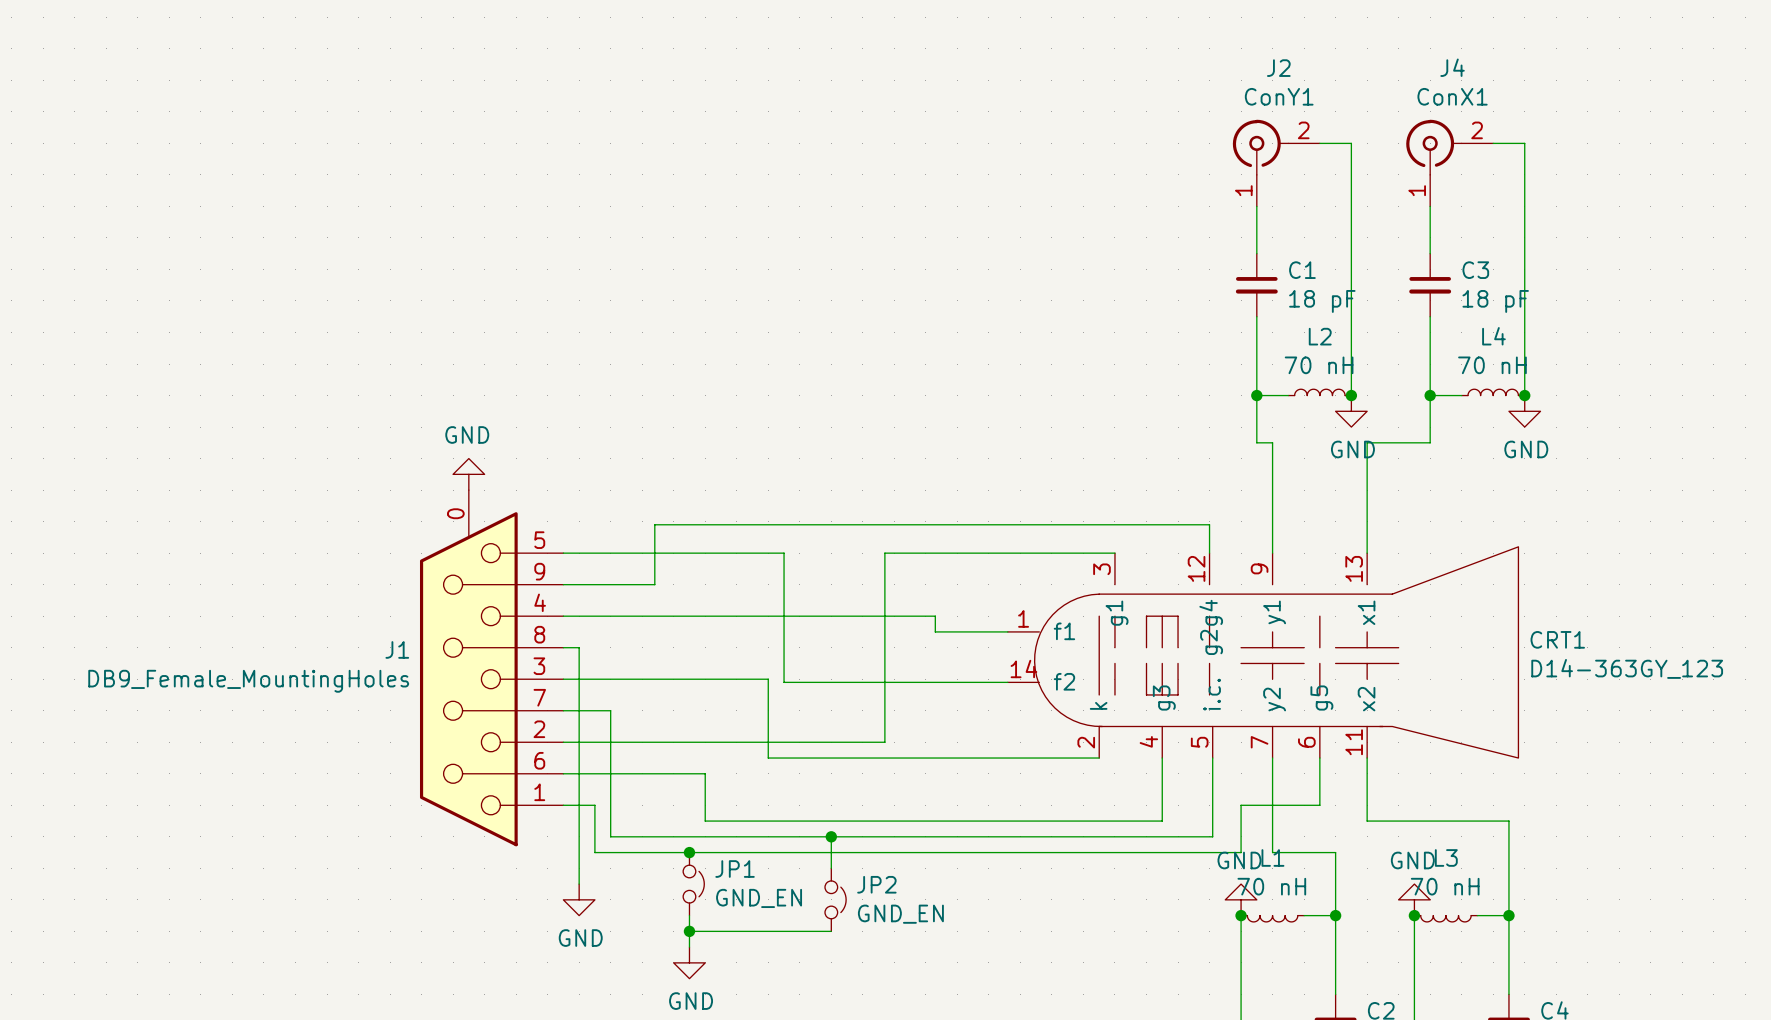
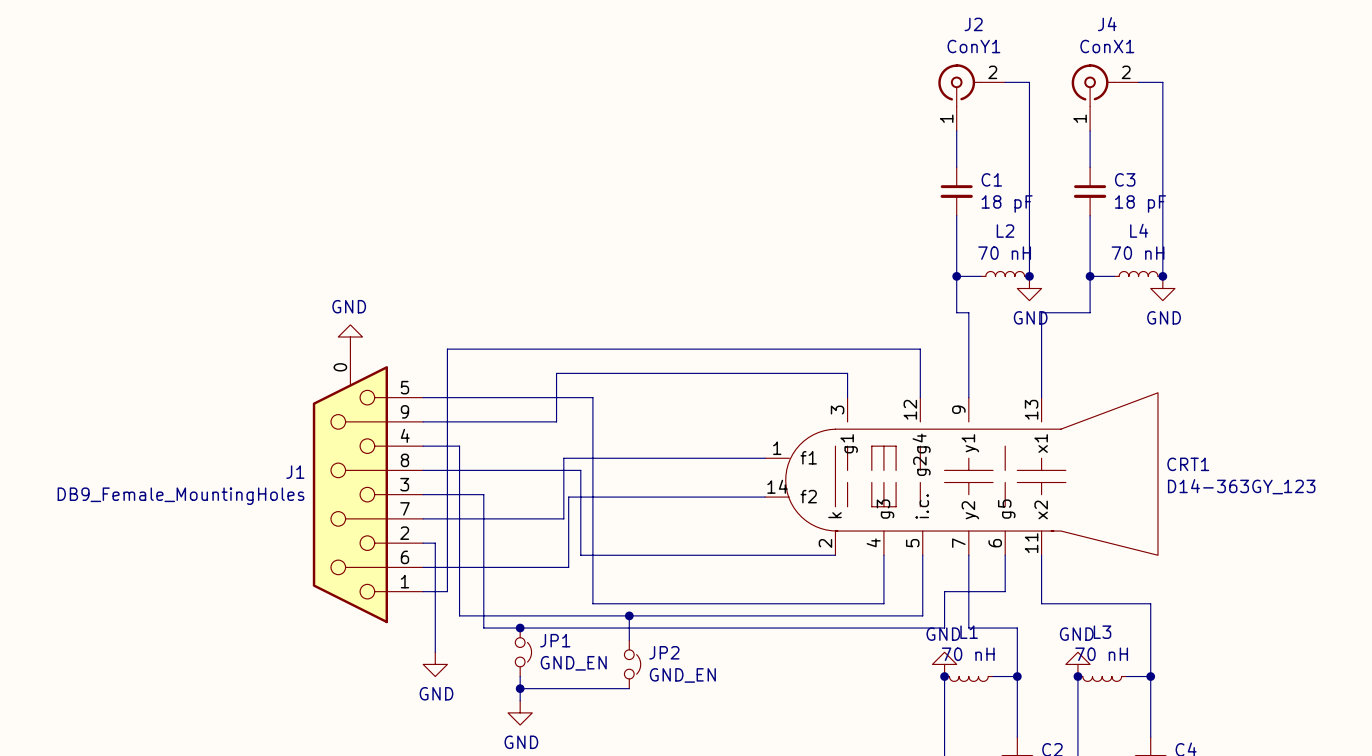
wire: (1209, 524) (654, 524) (654, 584) -> (920, 375) (920, 349) (447, 349) (447, 591)
wire: (1114, 553) (884, 553) (884, 742) (579, 742) (579, 647) -> (847, 397) (847, 373) (556, 373) (556, 421) (493, 421)
wire: (610, 616) (935, 616) (935, 631) -> (459, 446) (459, 518) (563, 518) (563, 458) (709, 458)
wire: (642, 679) (768, 679) -> (435, 470) (580, 470) (580, 494)
wire: (705, 773) (705, 821) (784, 821) -> (532, 567) (568, 567) (568, 497) (592, 497) (592, 603)
wire: (594, 805) (594, 852) (642, 852) -> (483, 494) (483, 628)

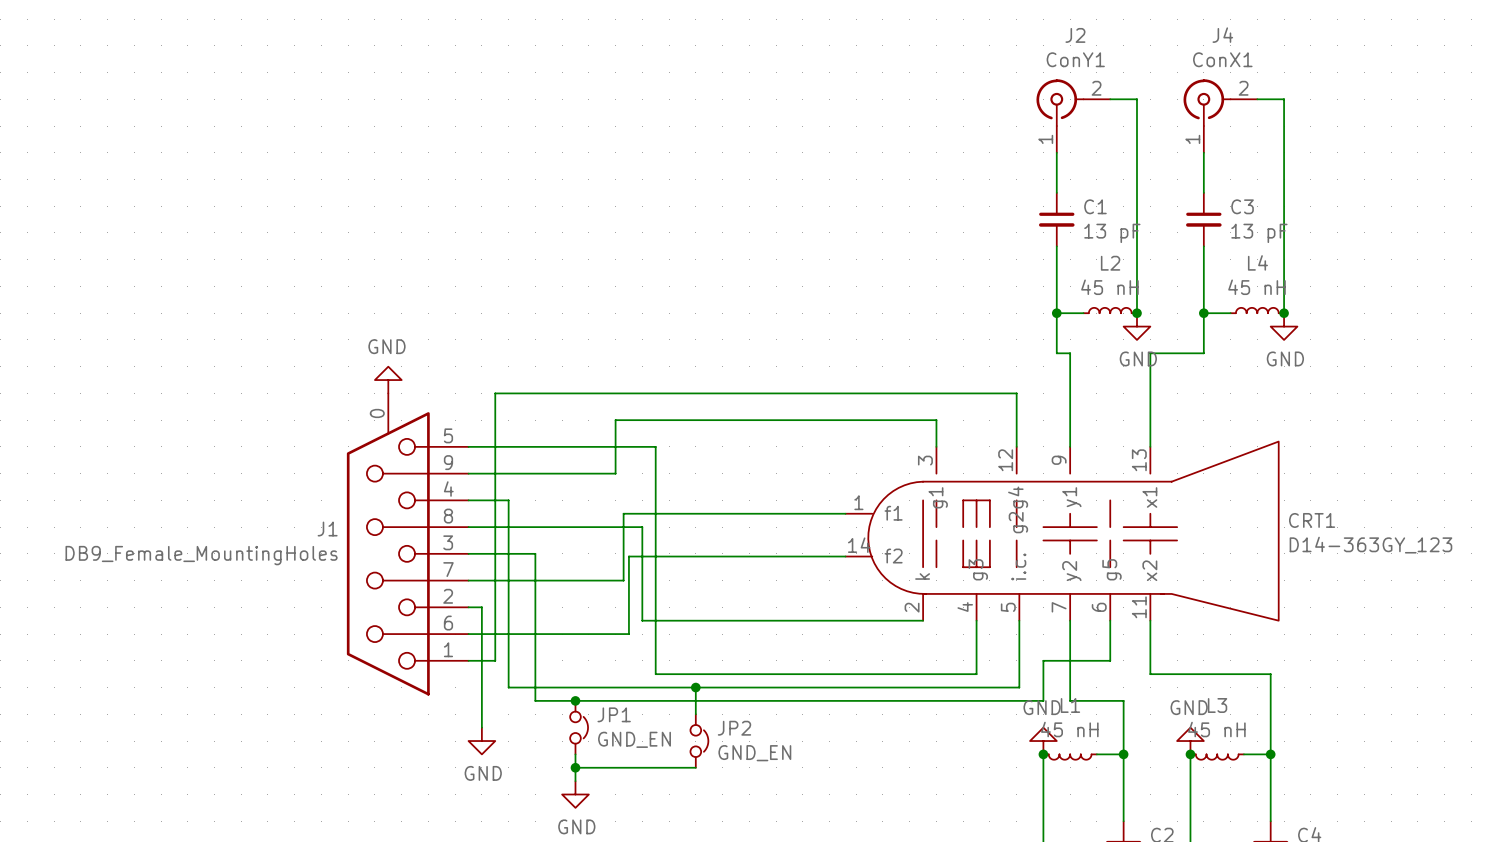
C1 value: 18 pF (1007, 203) -> 13 pF (1112, 233)
C3 value: 18 pF (1140, 203) -> 13 pF (1259, 233)
L2 value: 70 nH (1004, 253) -> 45 nH (1109, 287)
L4 value: 70 nH (1138, 253) -> 45 nH (1257, 287)
L1 value: 70 nH (968, 654) -> 45 nH (1069, 729)
L3 value: 70 nH (1101, 654) -> 45 nH (1216, 729)

